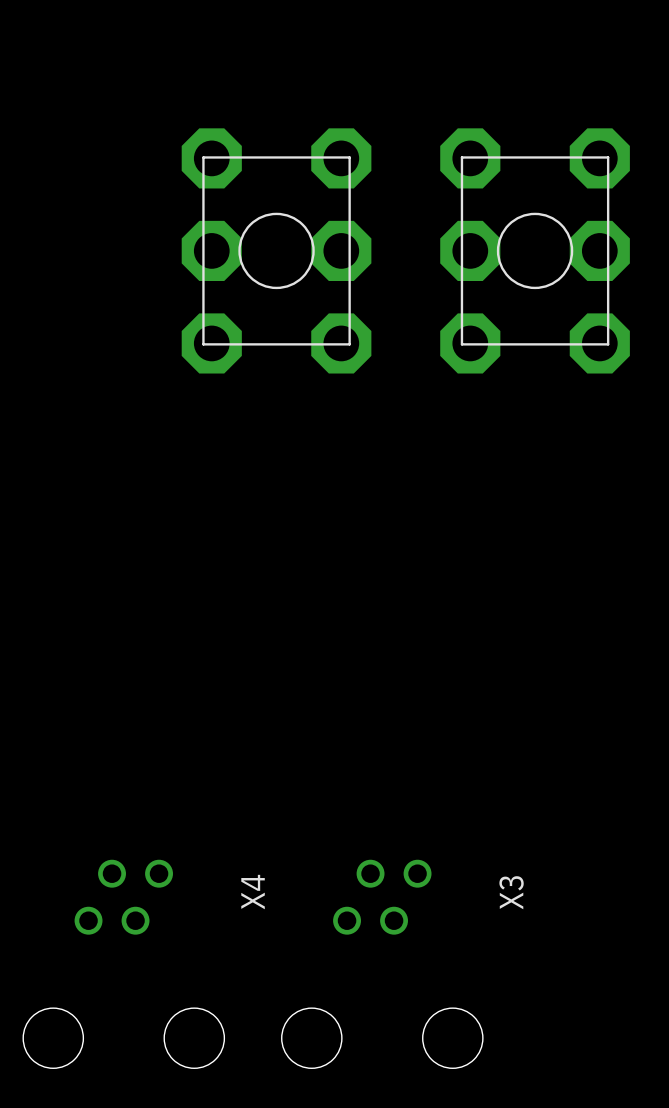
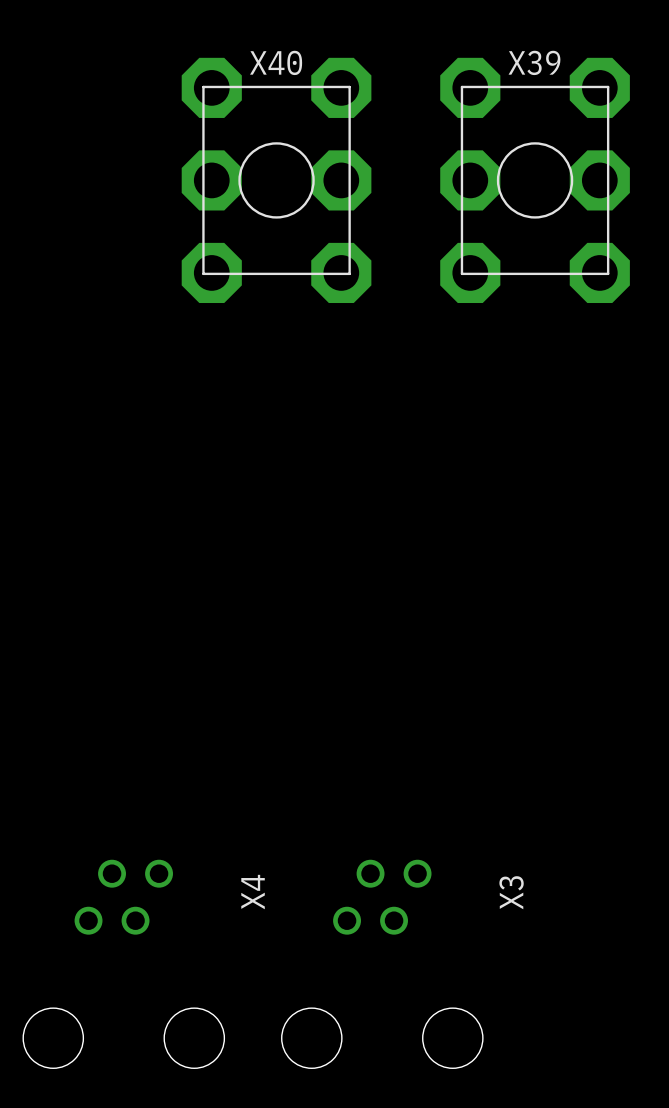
X40: none -> (276, 180)
X39: none -> (535, 180)
part: (276, 250) -> none
part: (535, 250) -> none

